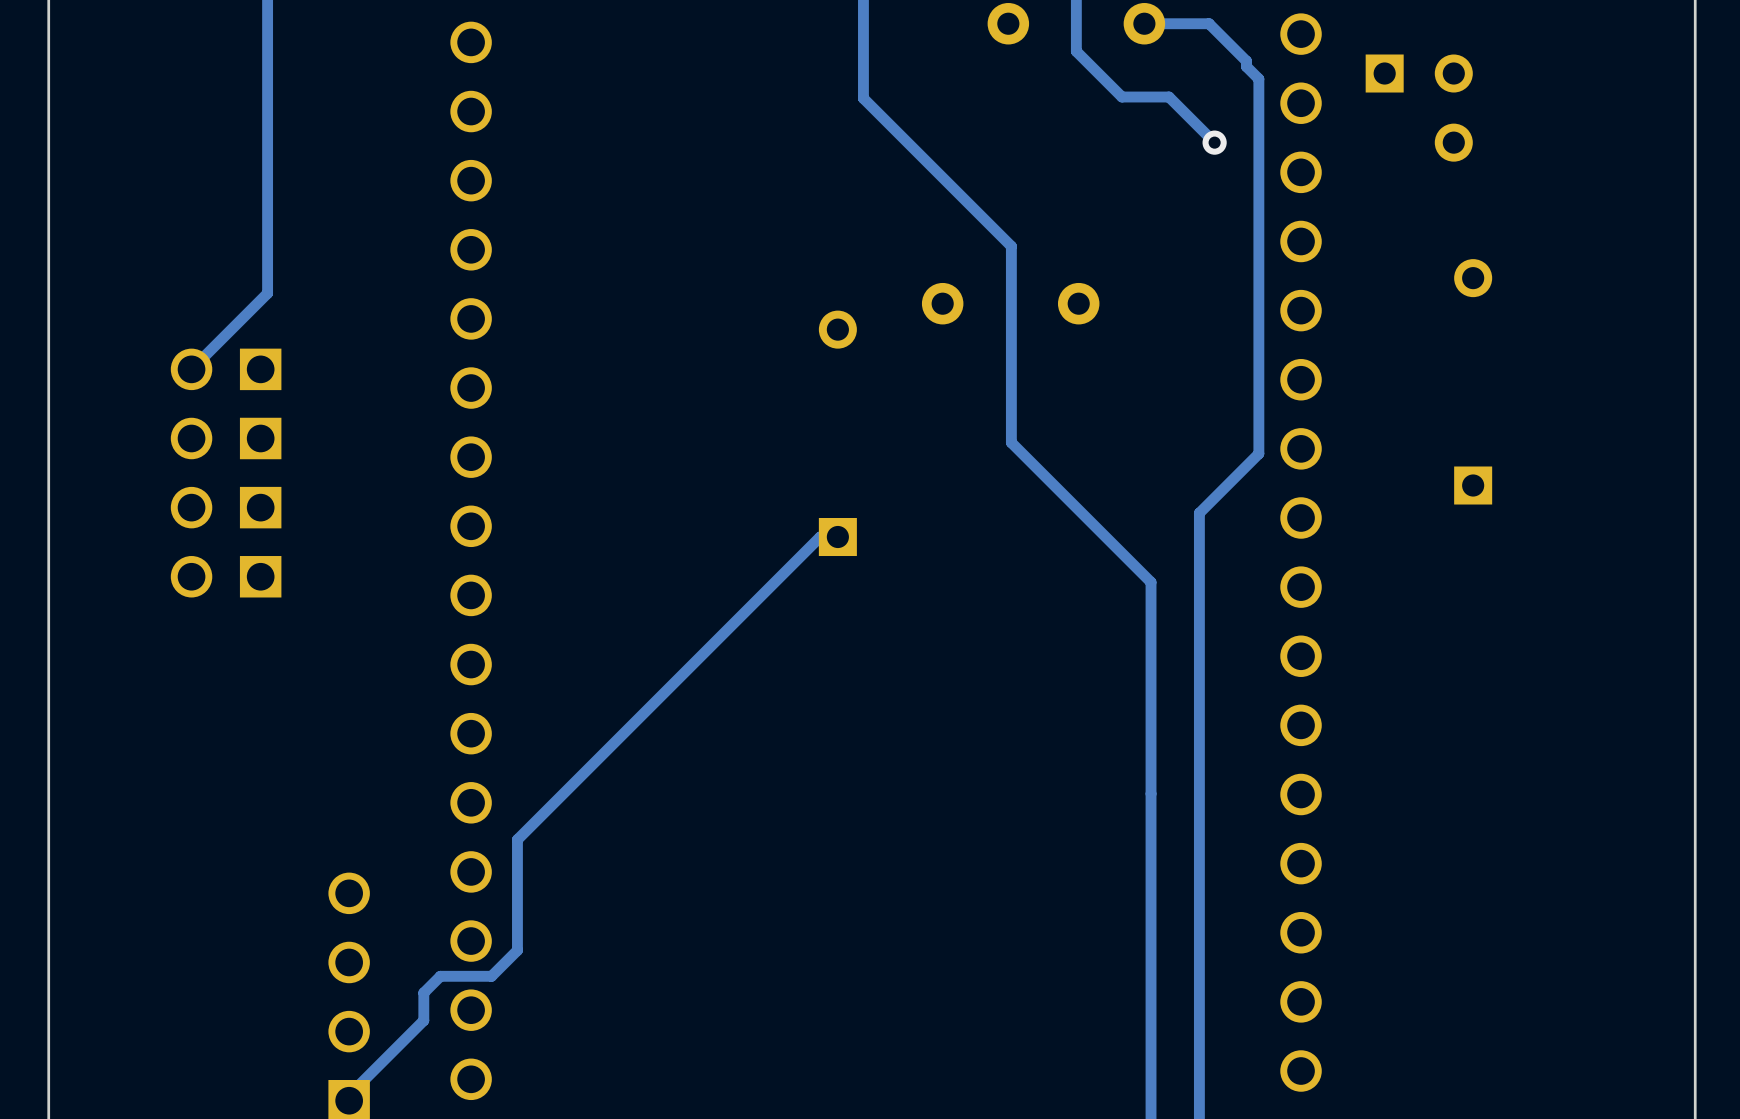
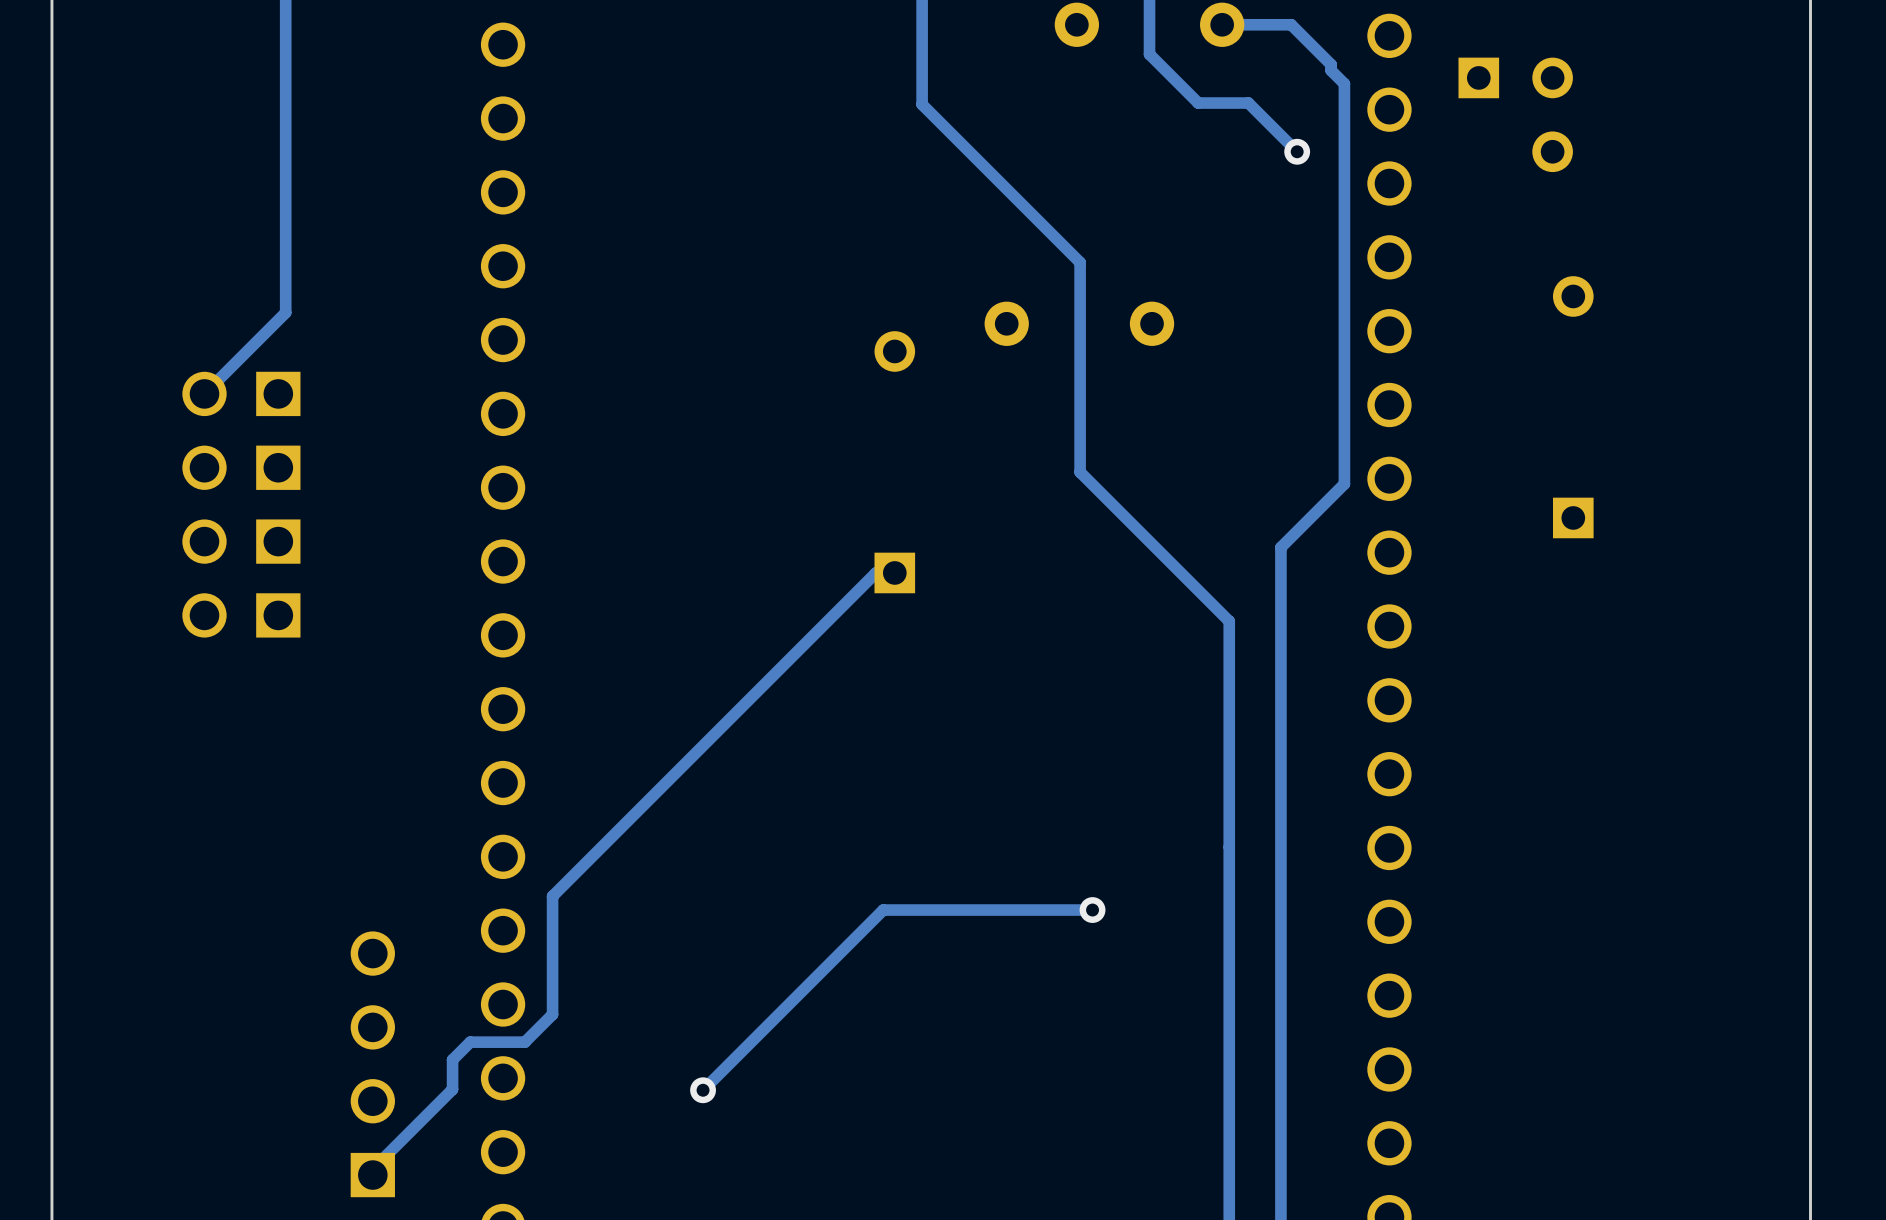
track: none -> (1092, 910) (883, 910) (703, 1090)
via: none -> (1092, 910)
via: none -> (703, 1090)

